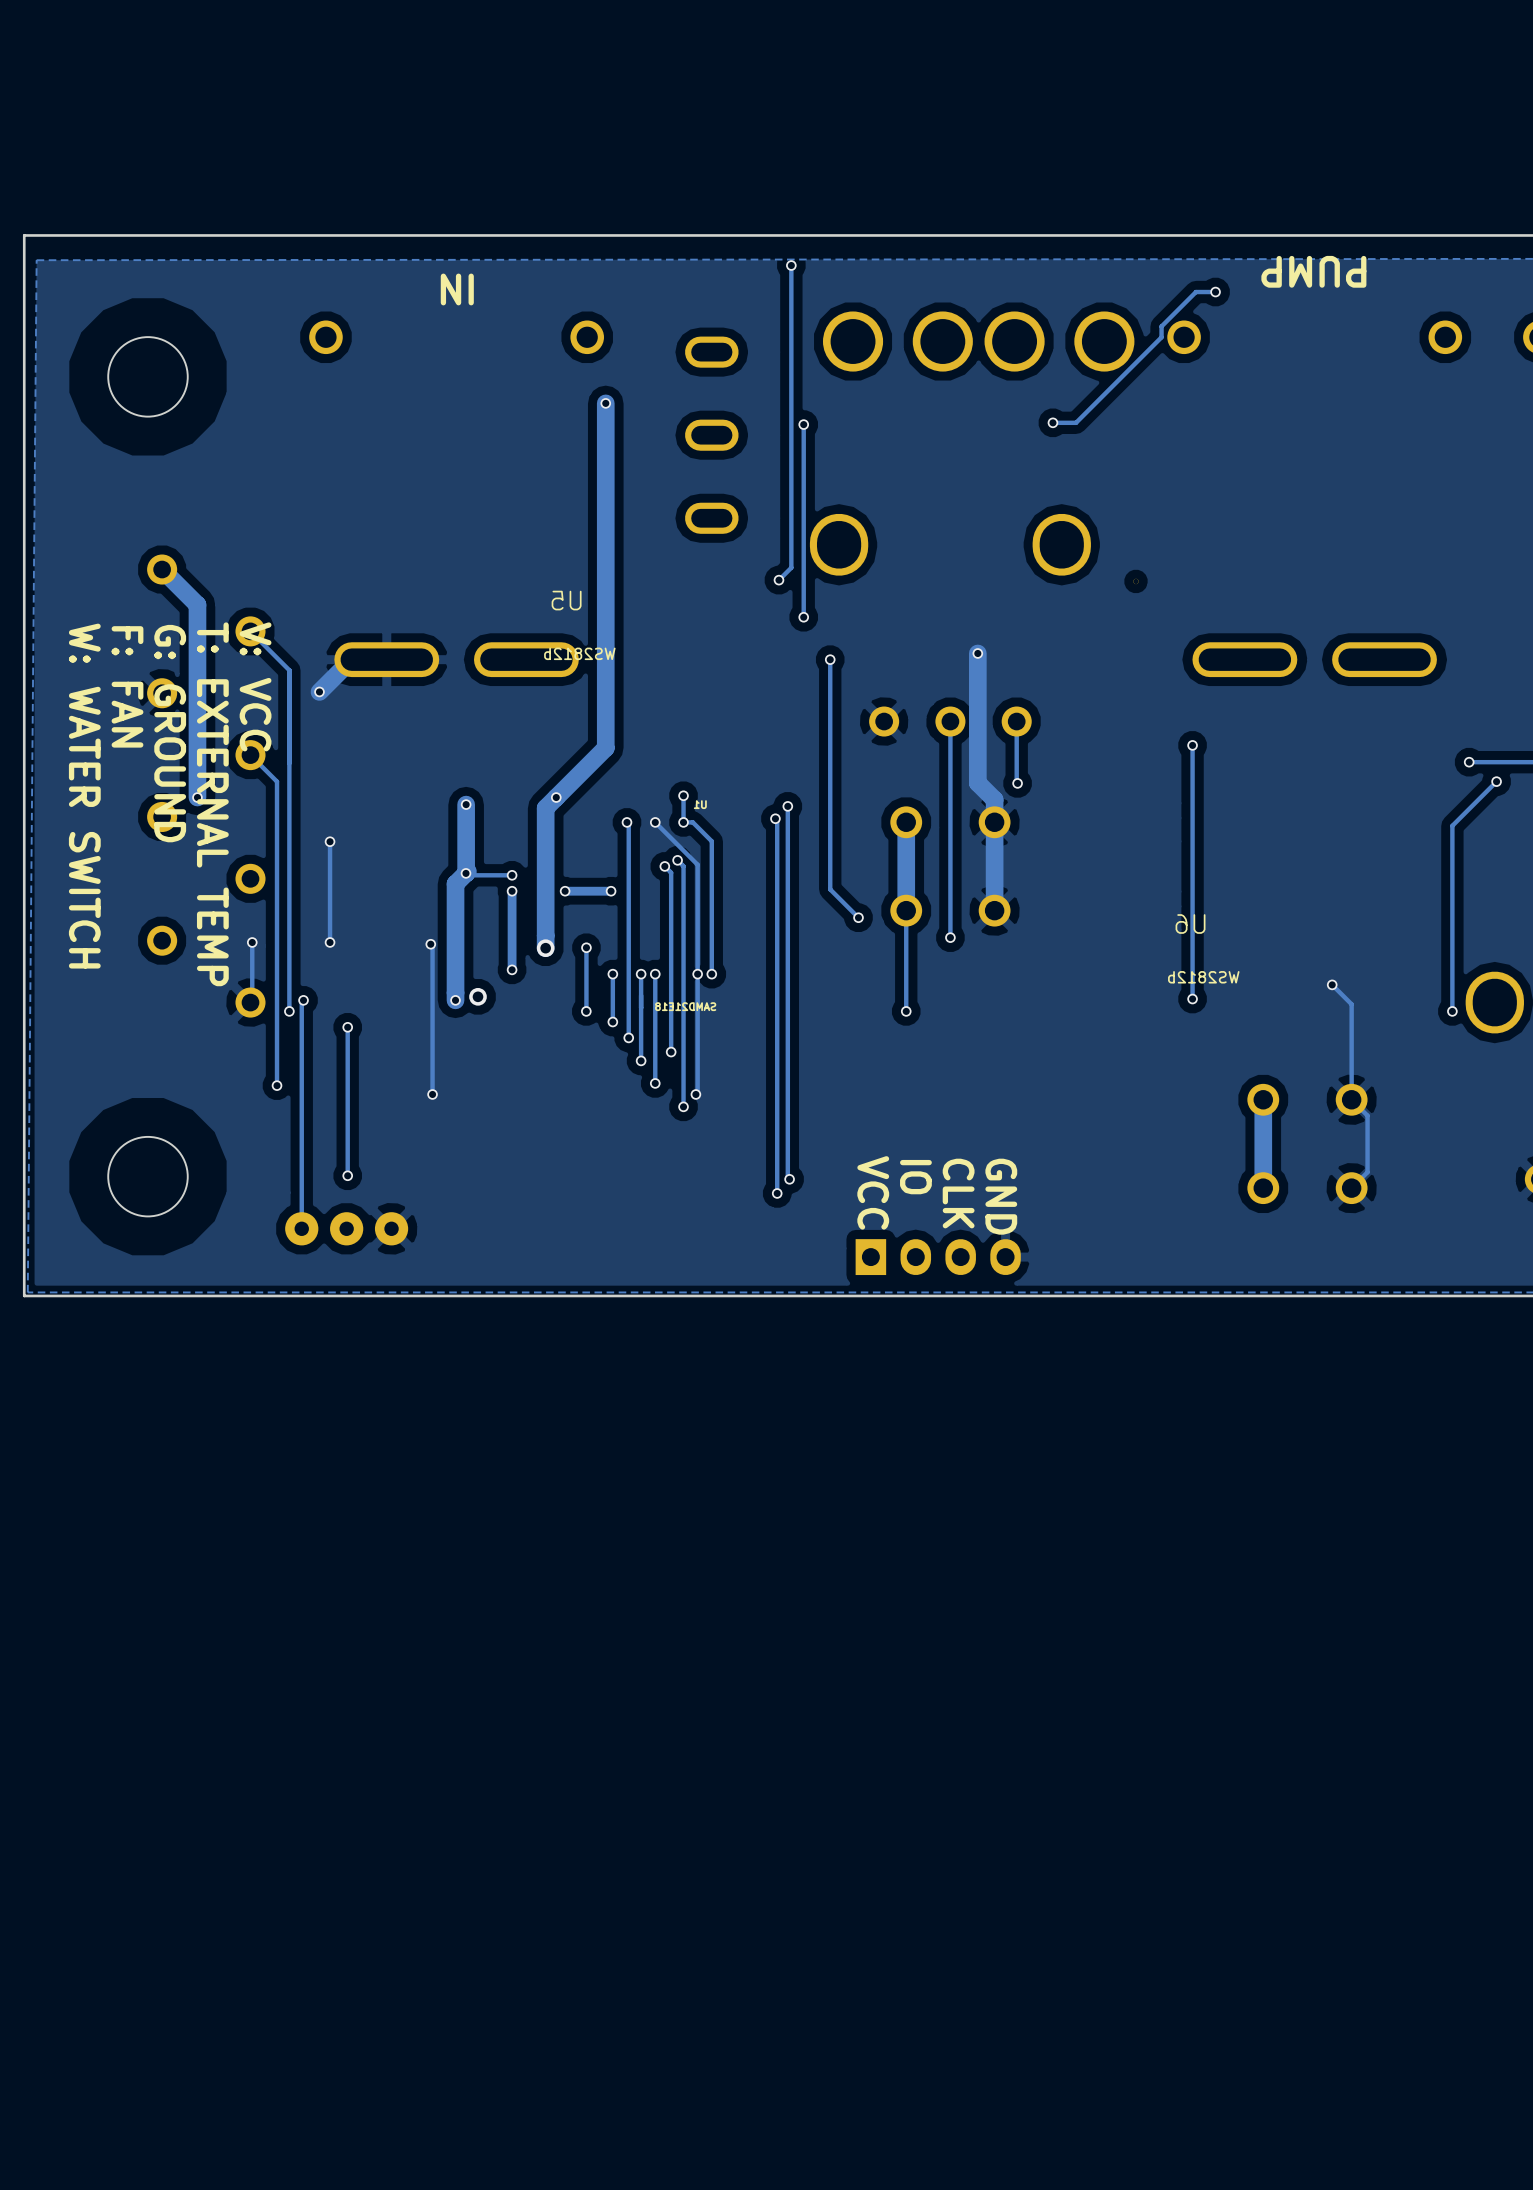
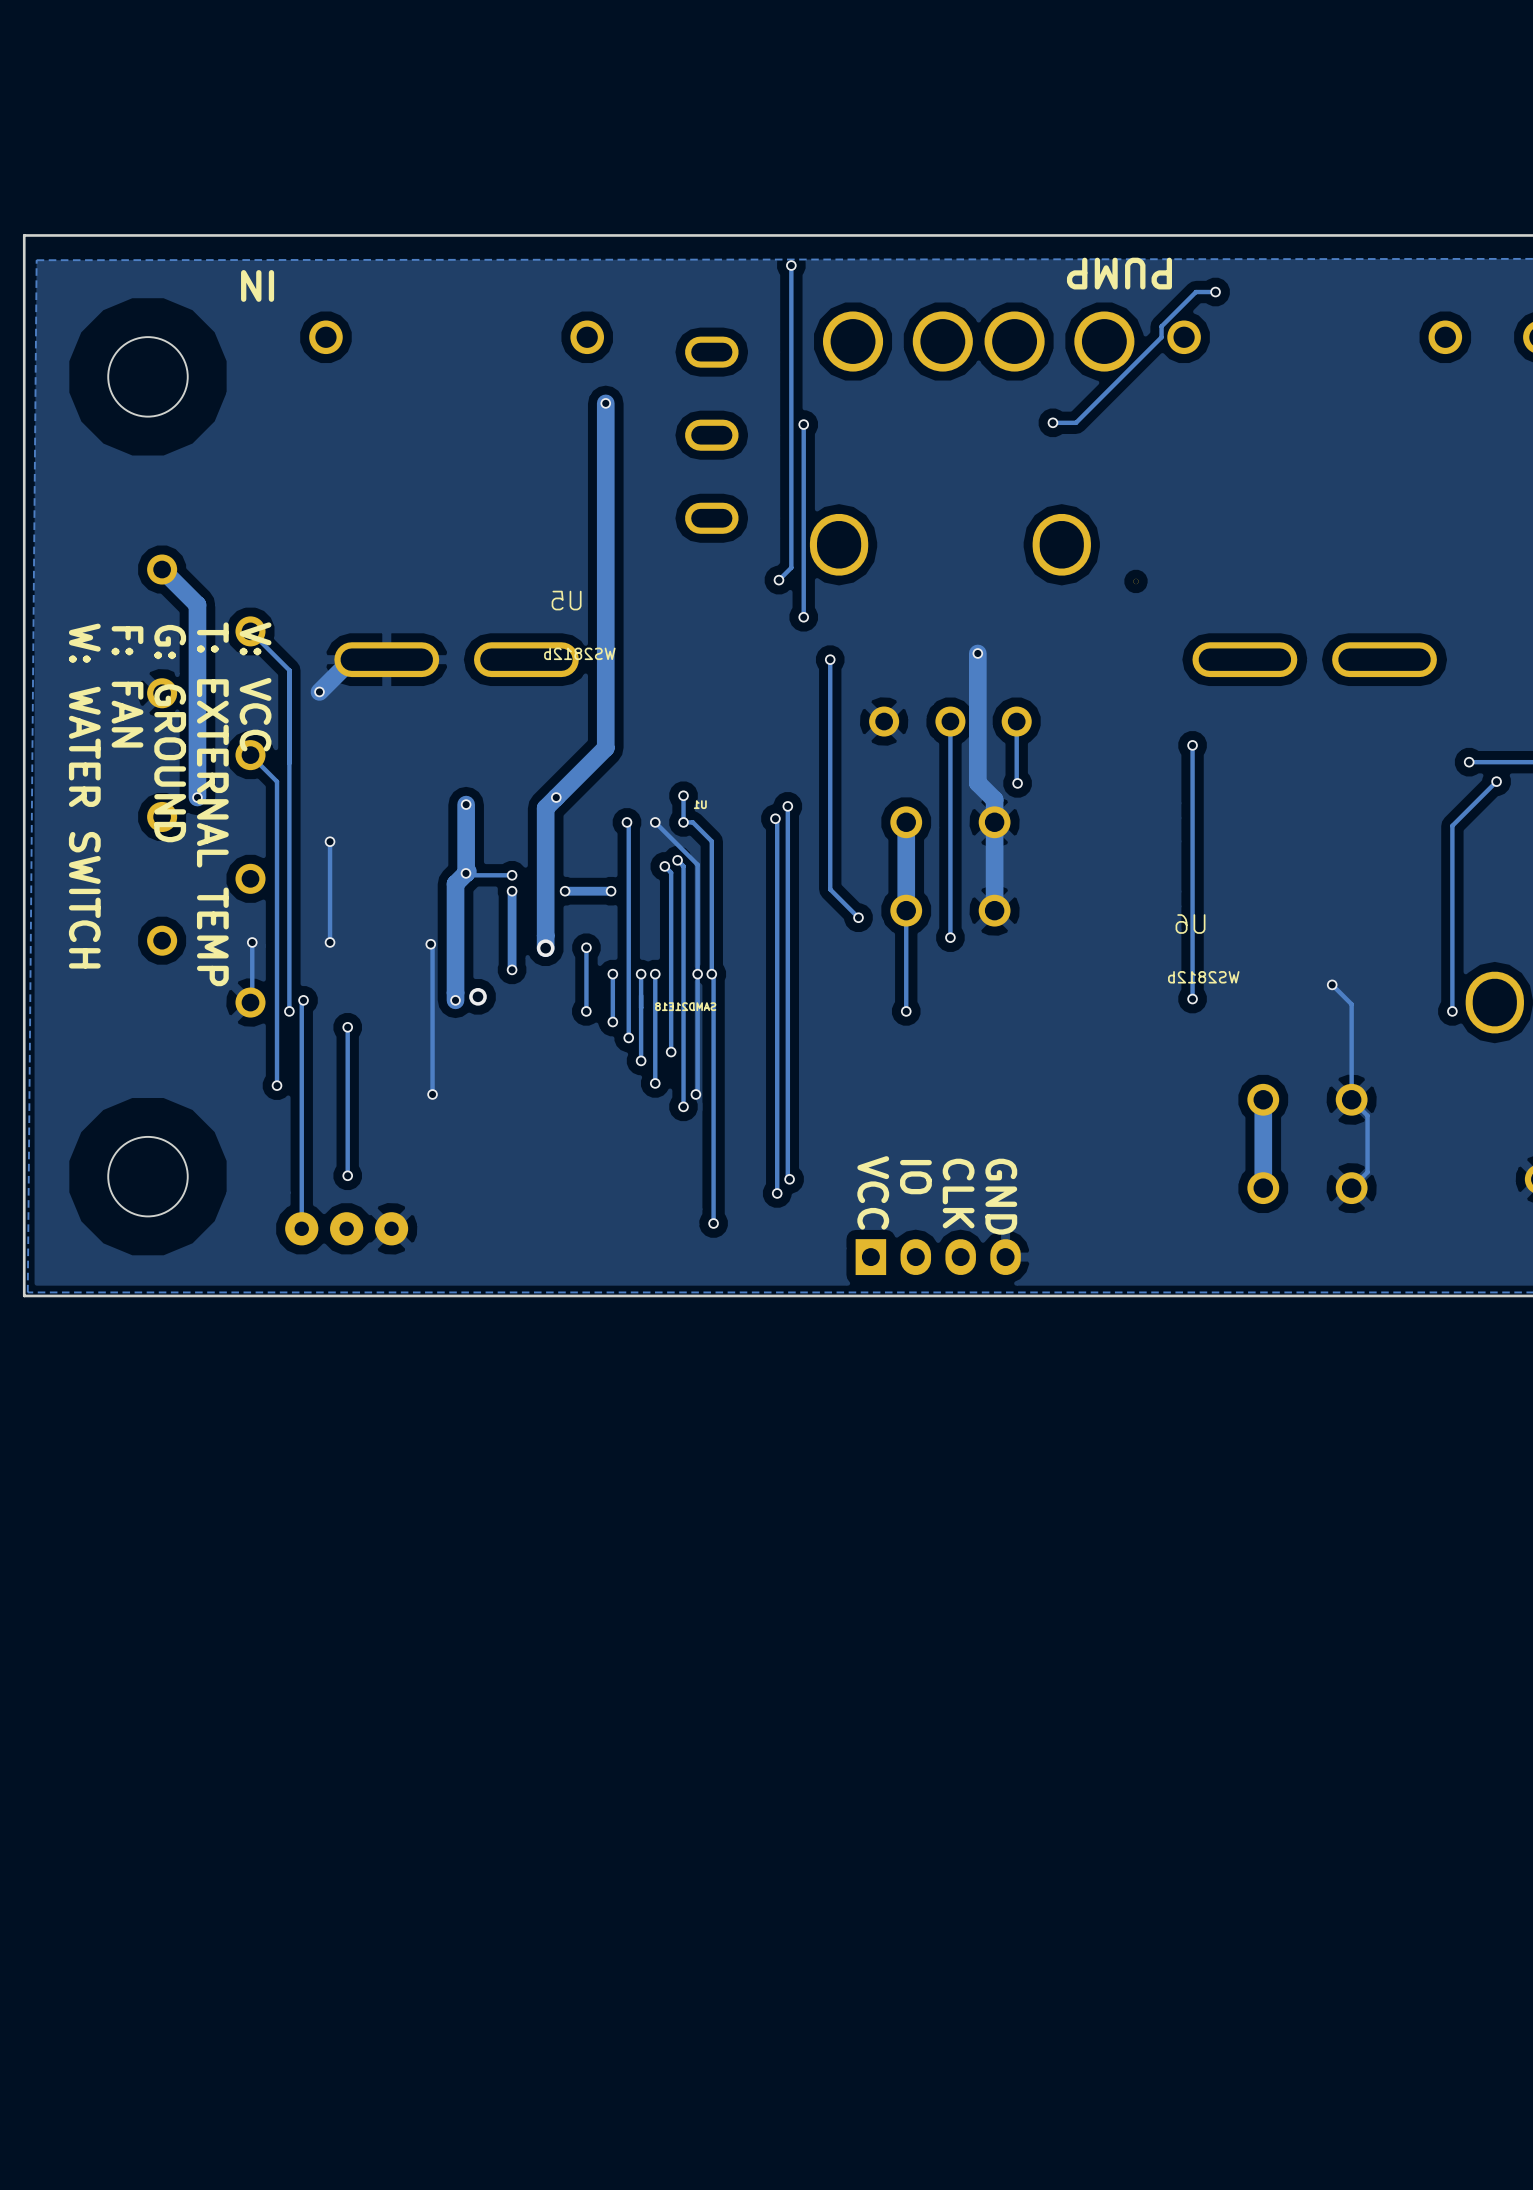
text position: PUMP (1313, 271) -> PUMP (1119, 273)
text position: IN (457, 289) -> IN (257, 285)
track: none -> (713, 975) (713, 1223)
via: none -> (713, 1223)

